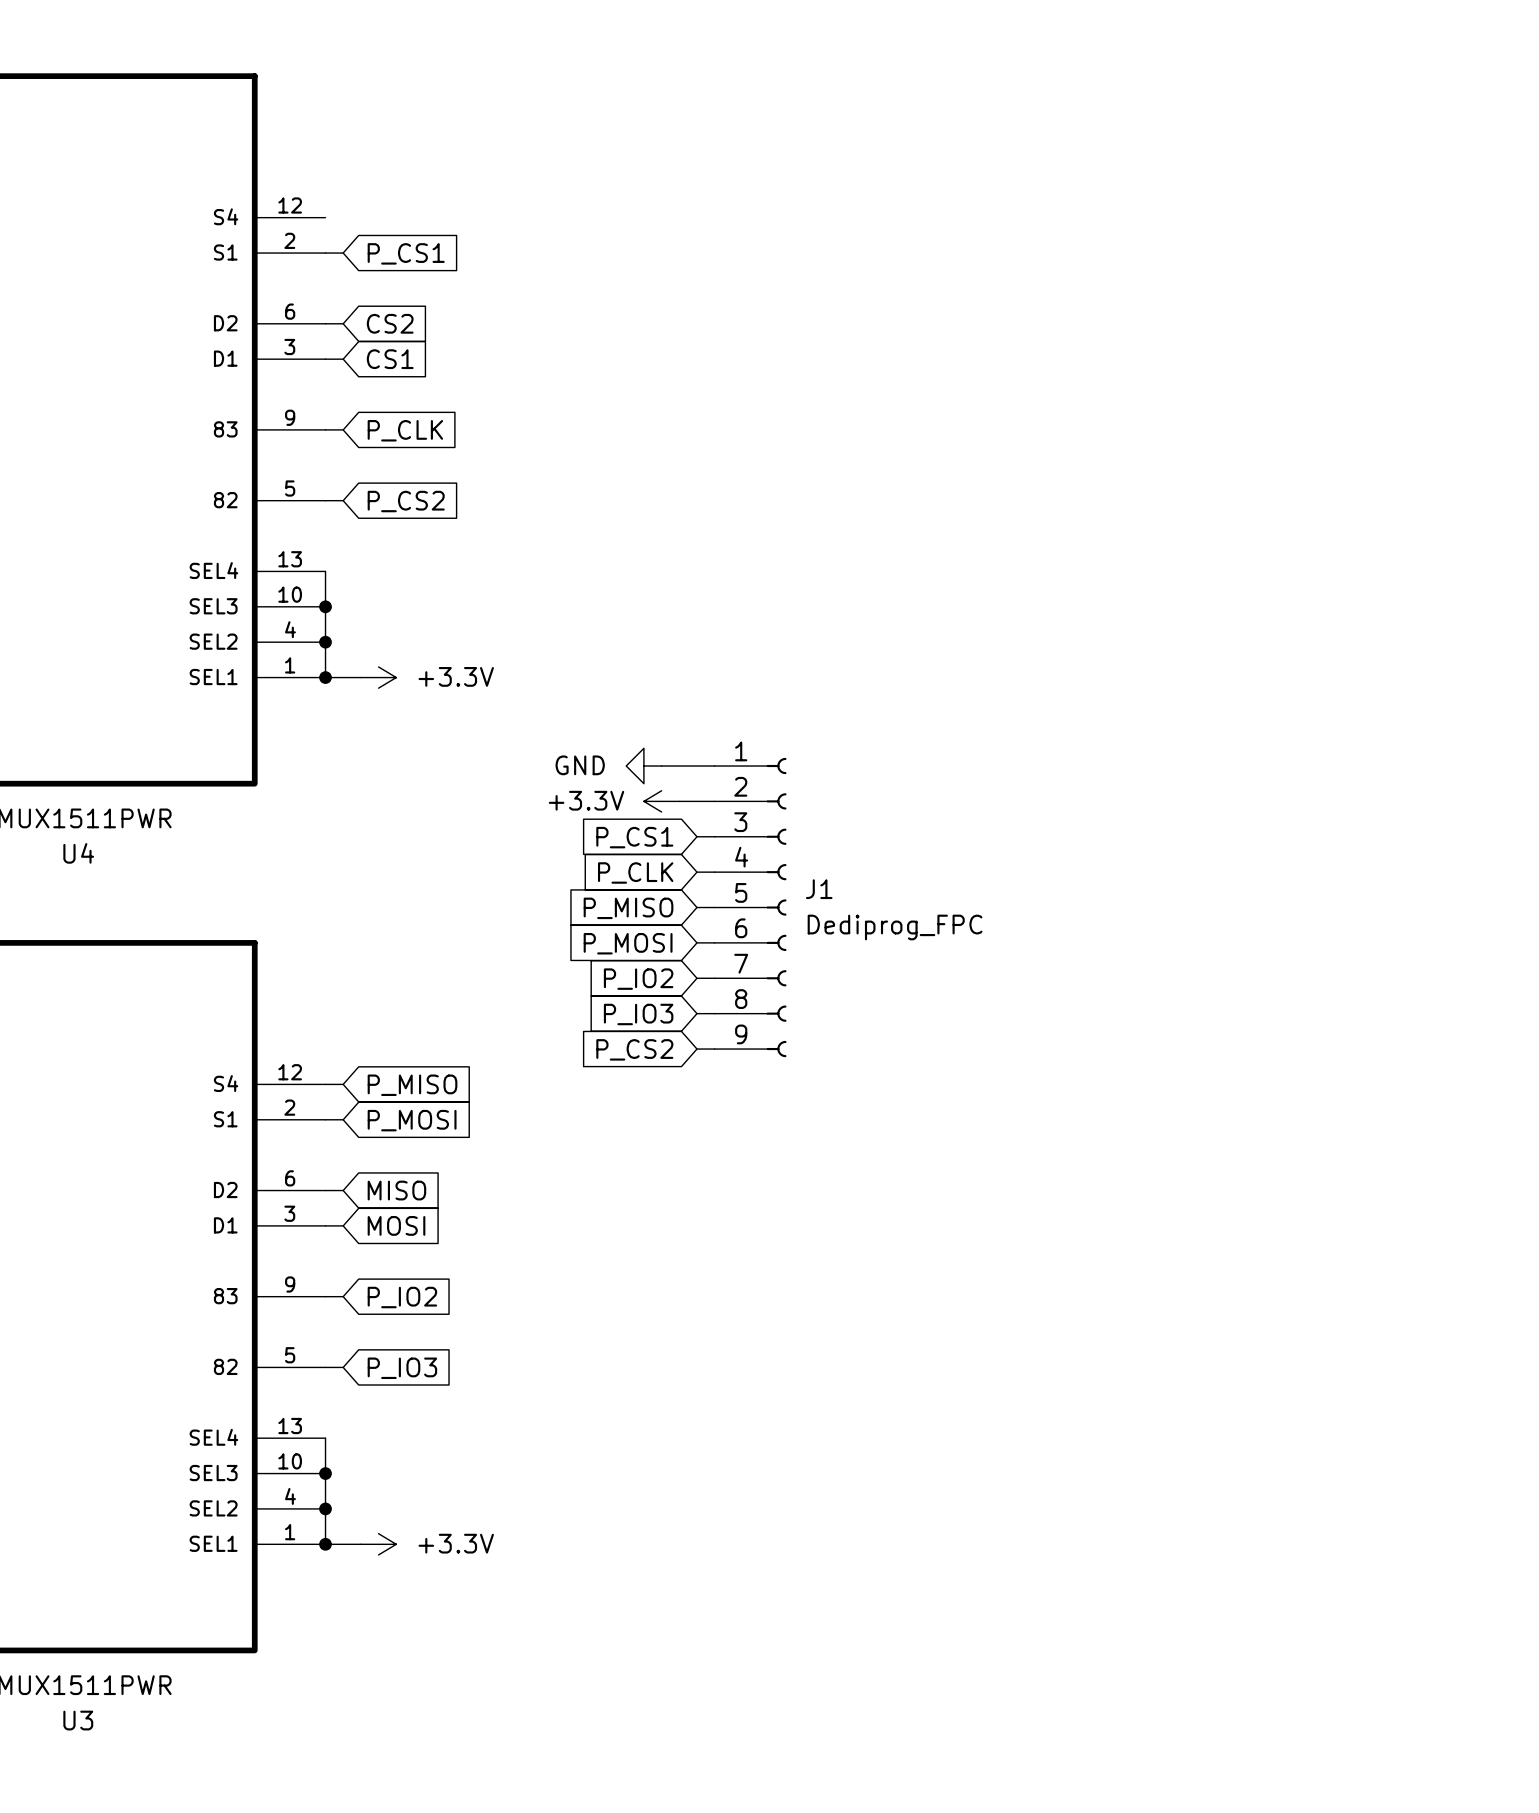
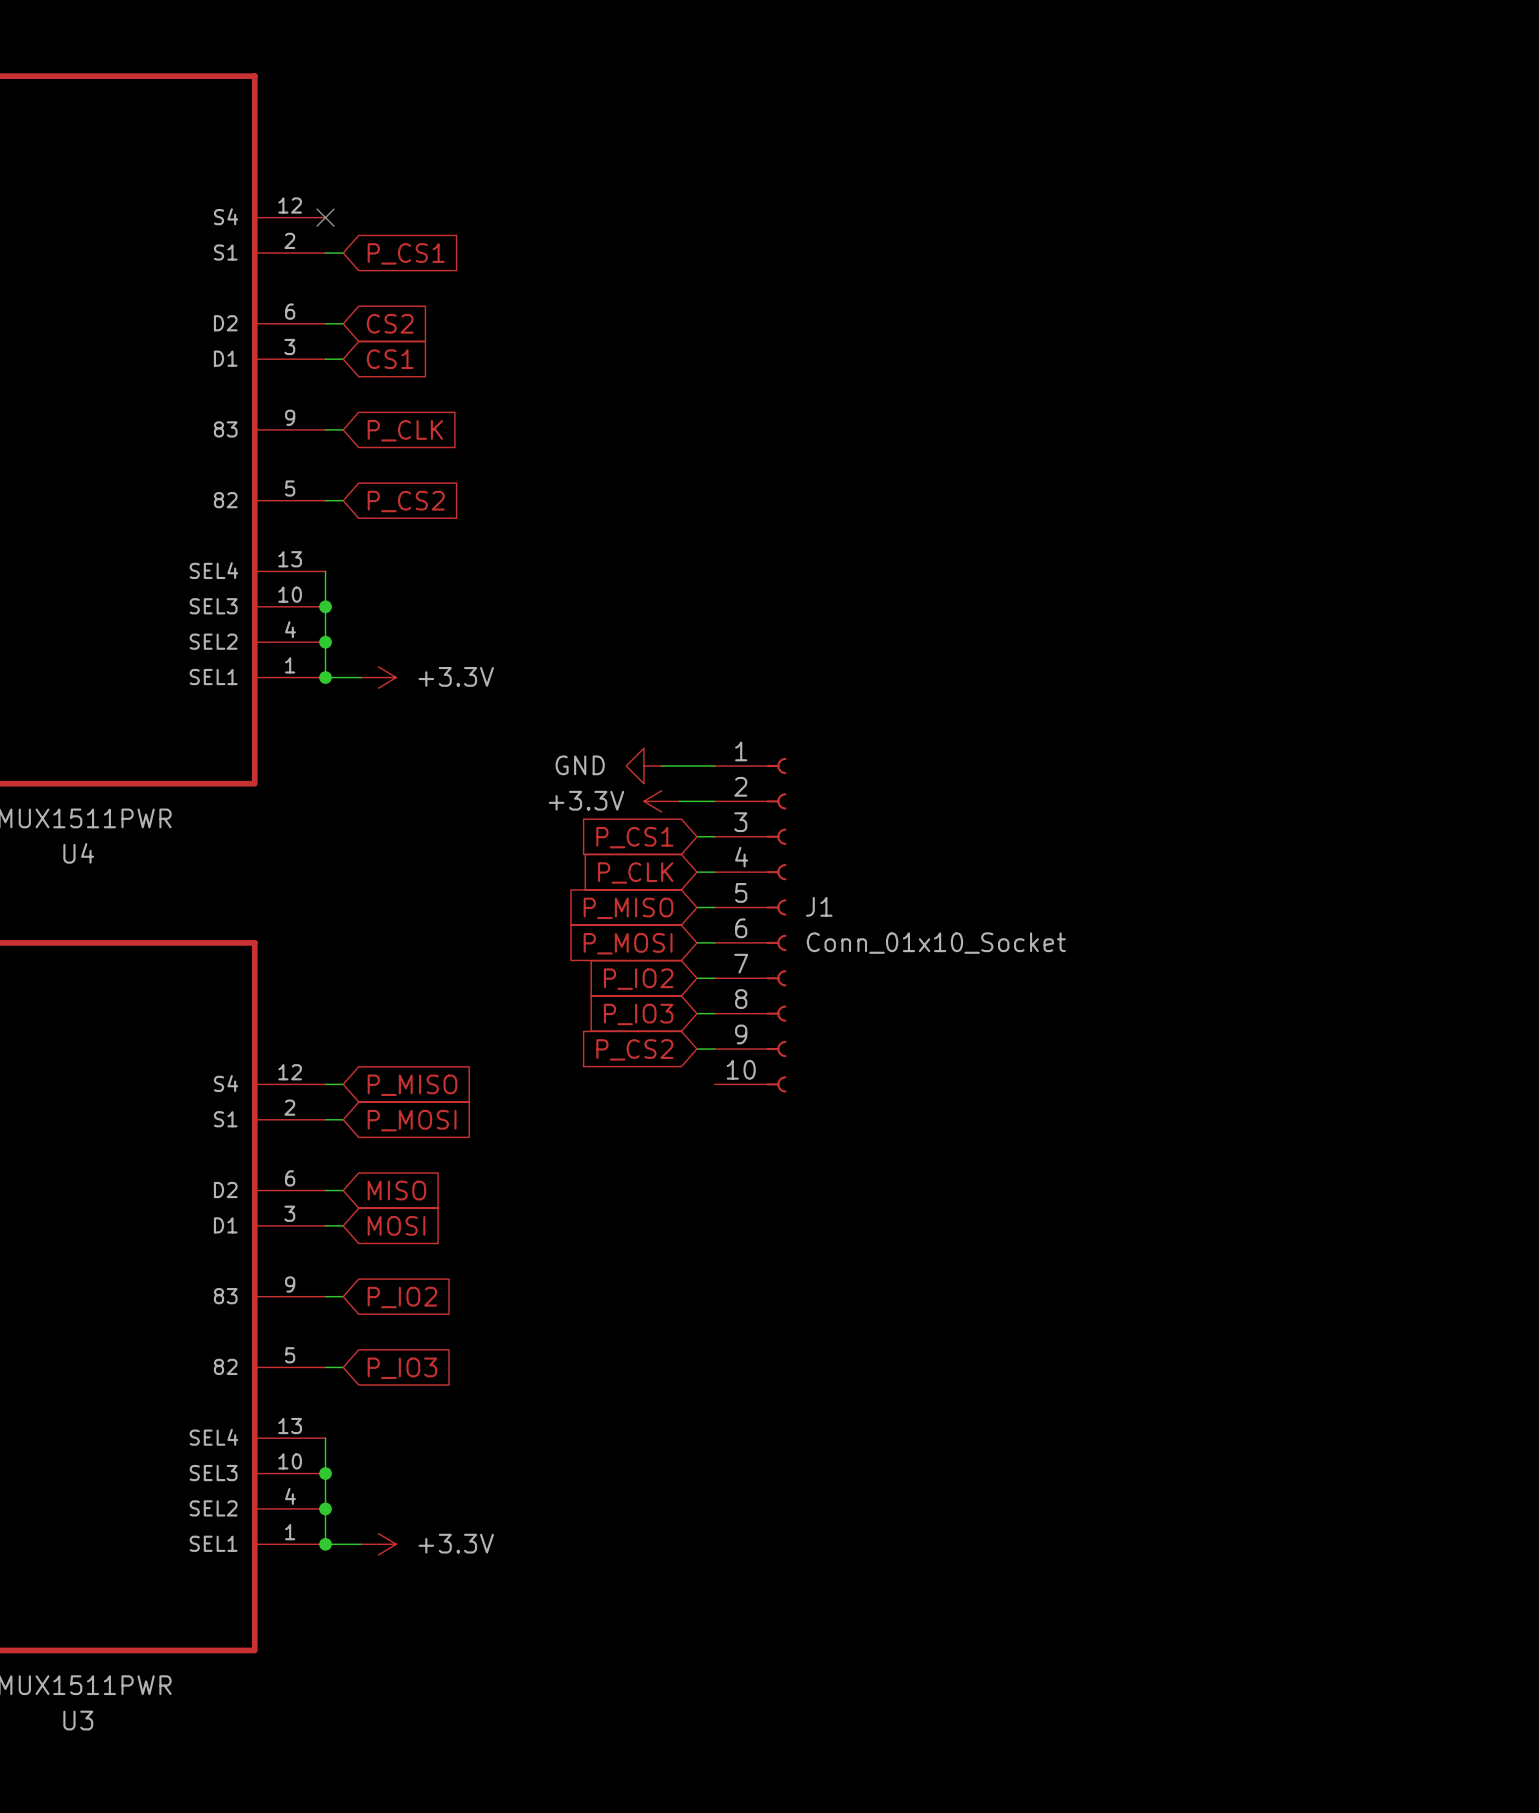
no-connect mark: none -> (325, 217)
J1 symbol: [714, 757, 787, 1058] -> [714, 757, 787, 1093]
J1 value: Dediprog_FPC (895, 927) -> Conn_01x10_Socket (936, 943)

